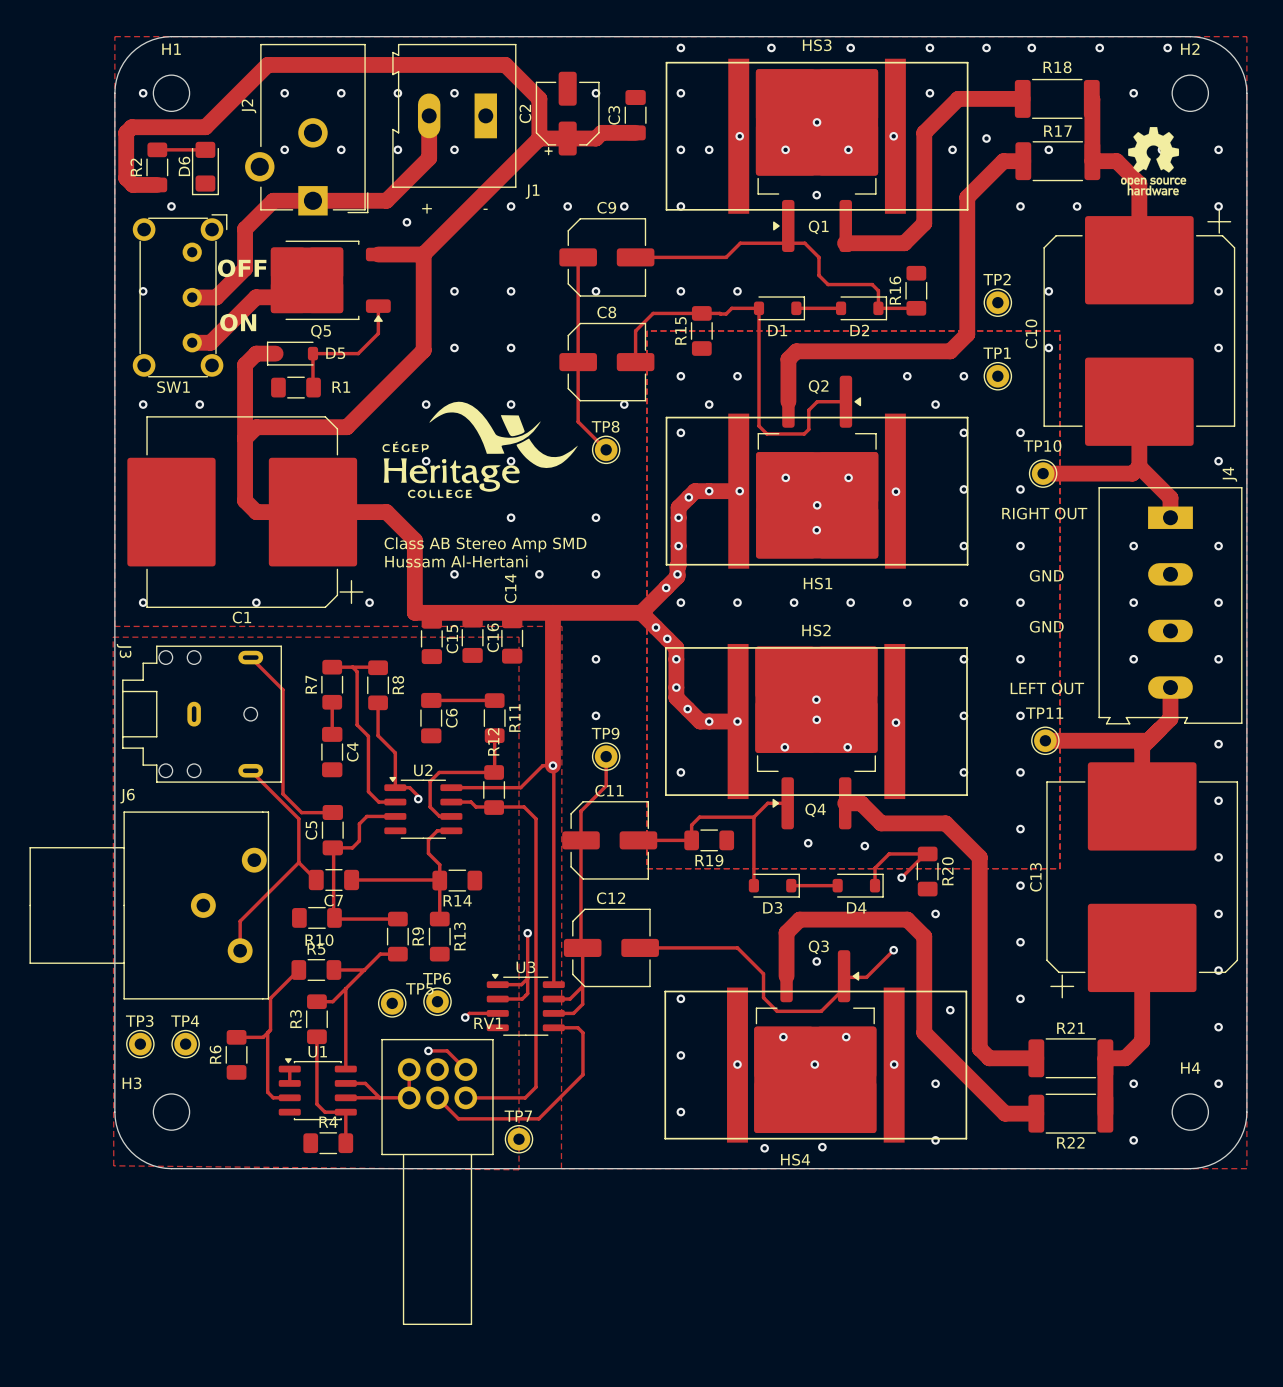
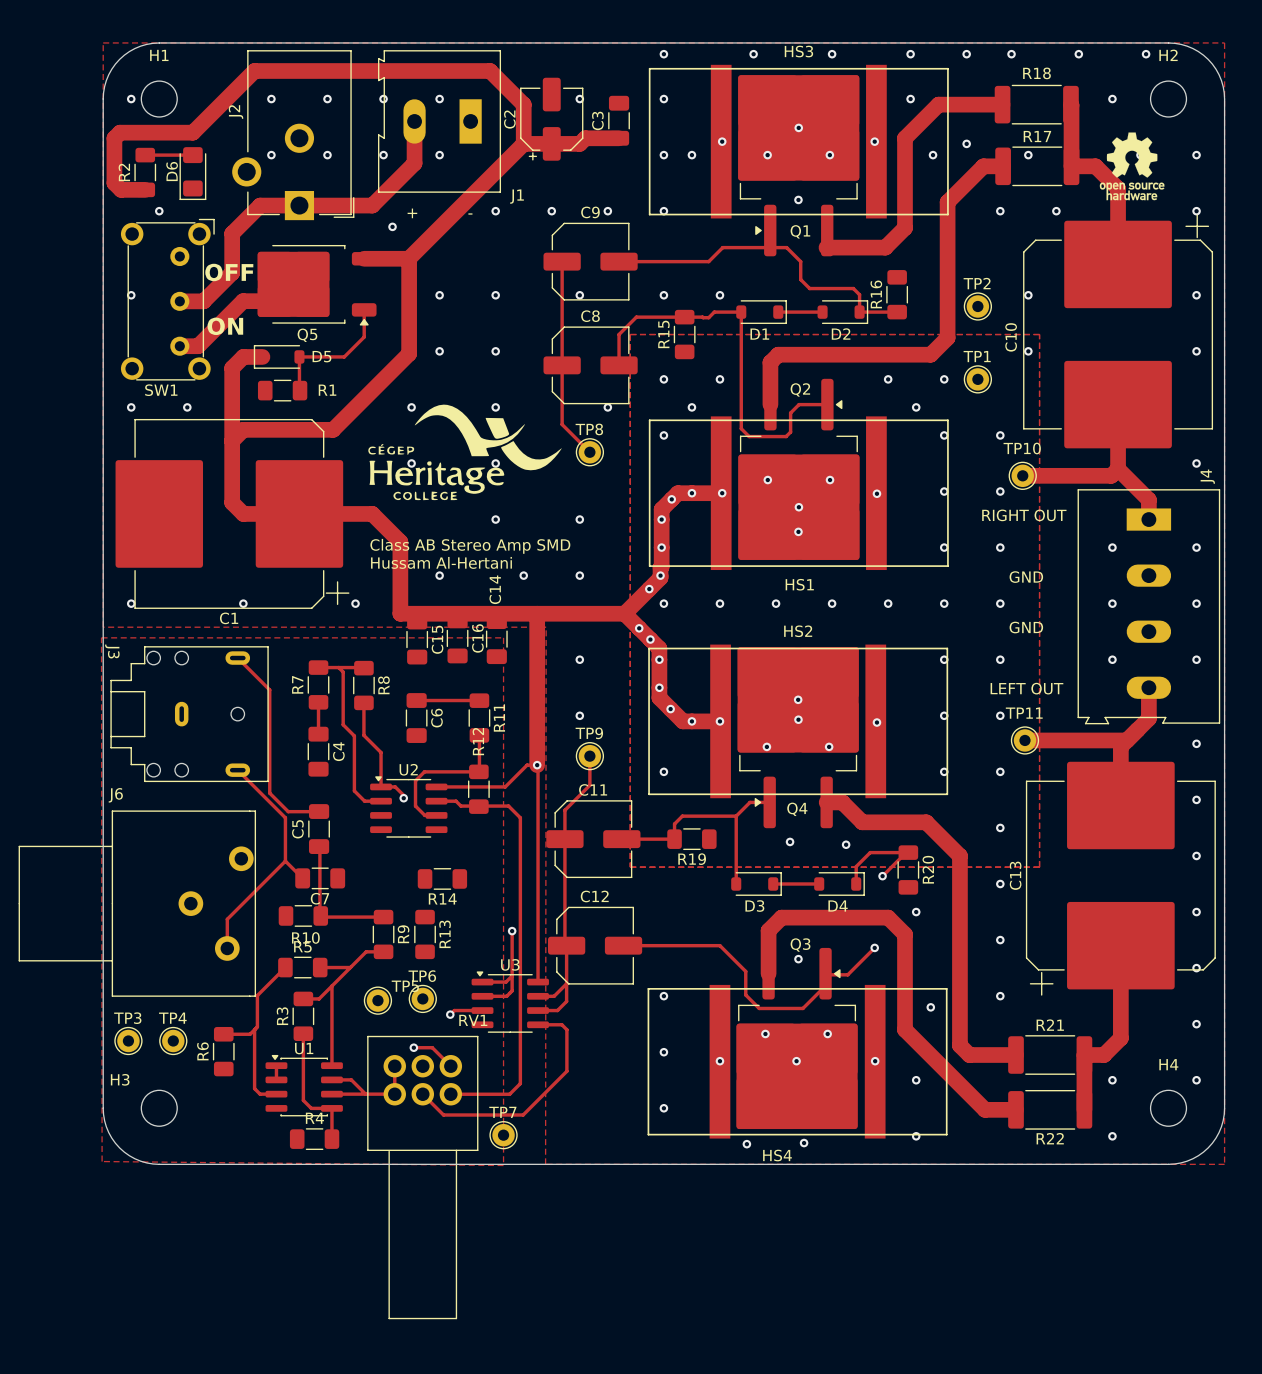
track: (395, 816) (366, 816) (359, 823) (359, 840) (352, 847) (332, 847) -> none
track: (451, 830) (437, 830) (428, 839) (428, 853) (439, 864) (439, 919) -> none
track: (351, 880) (439, 880) -> none

